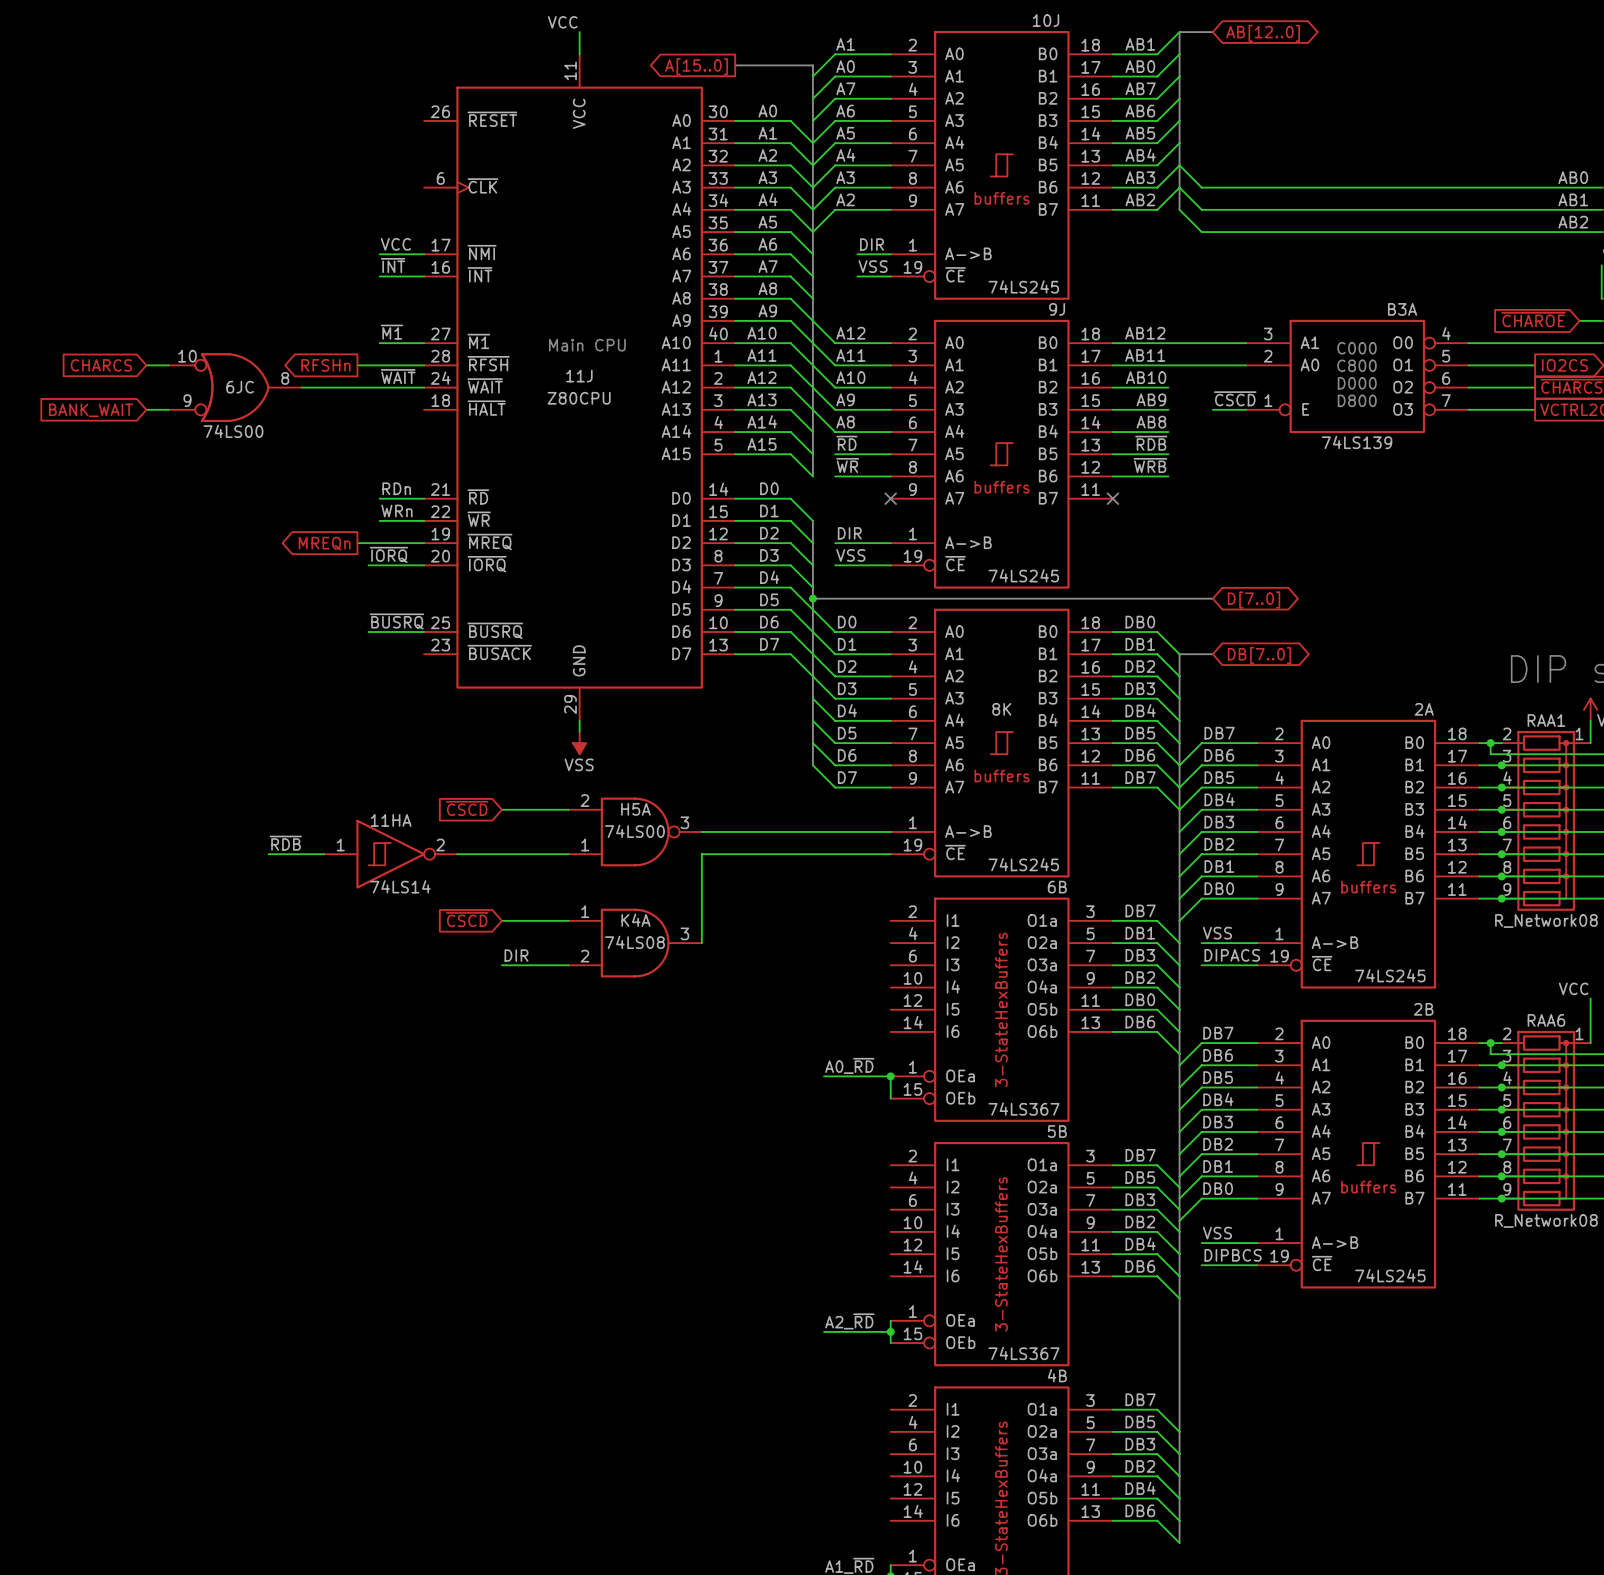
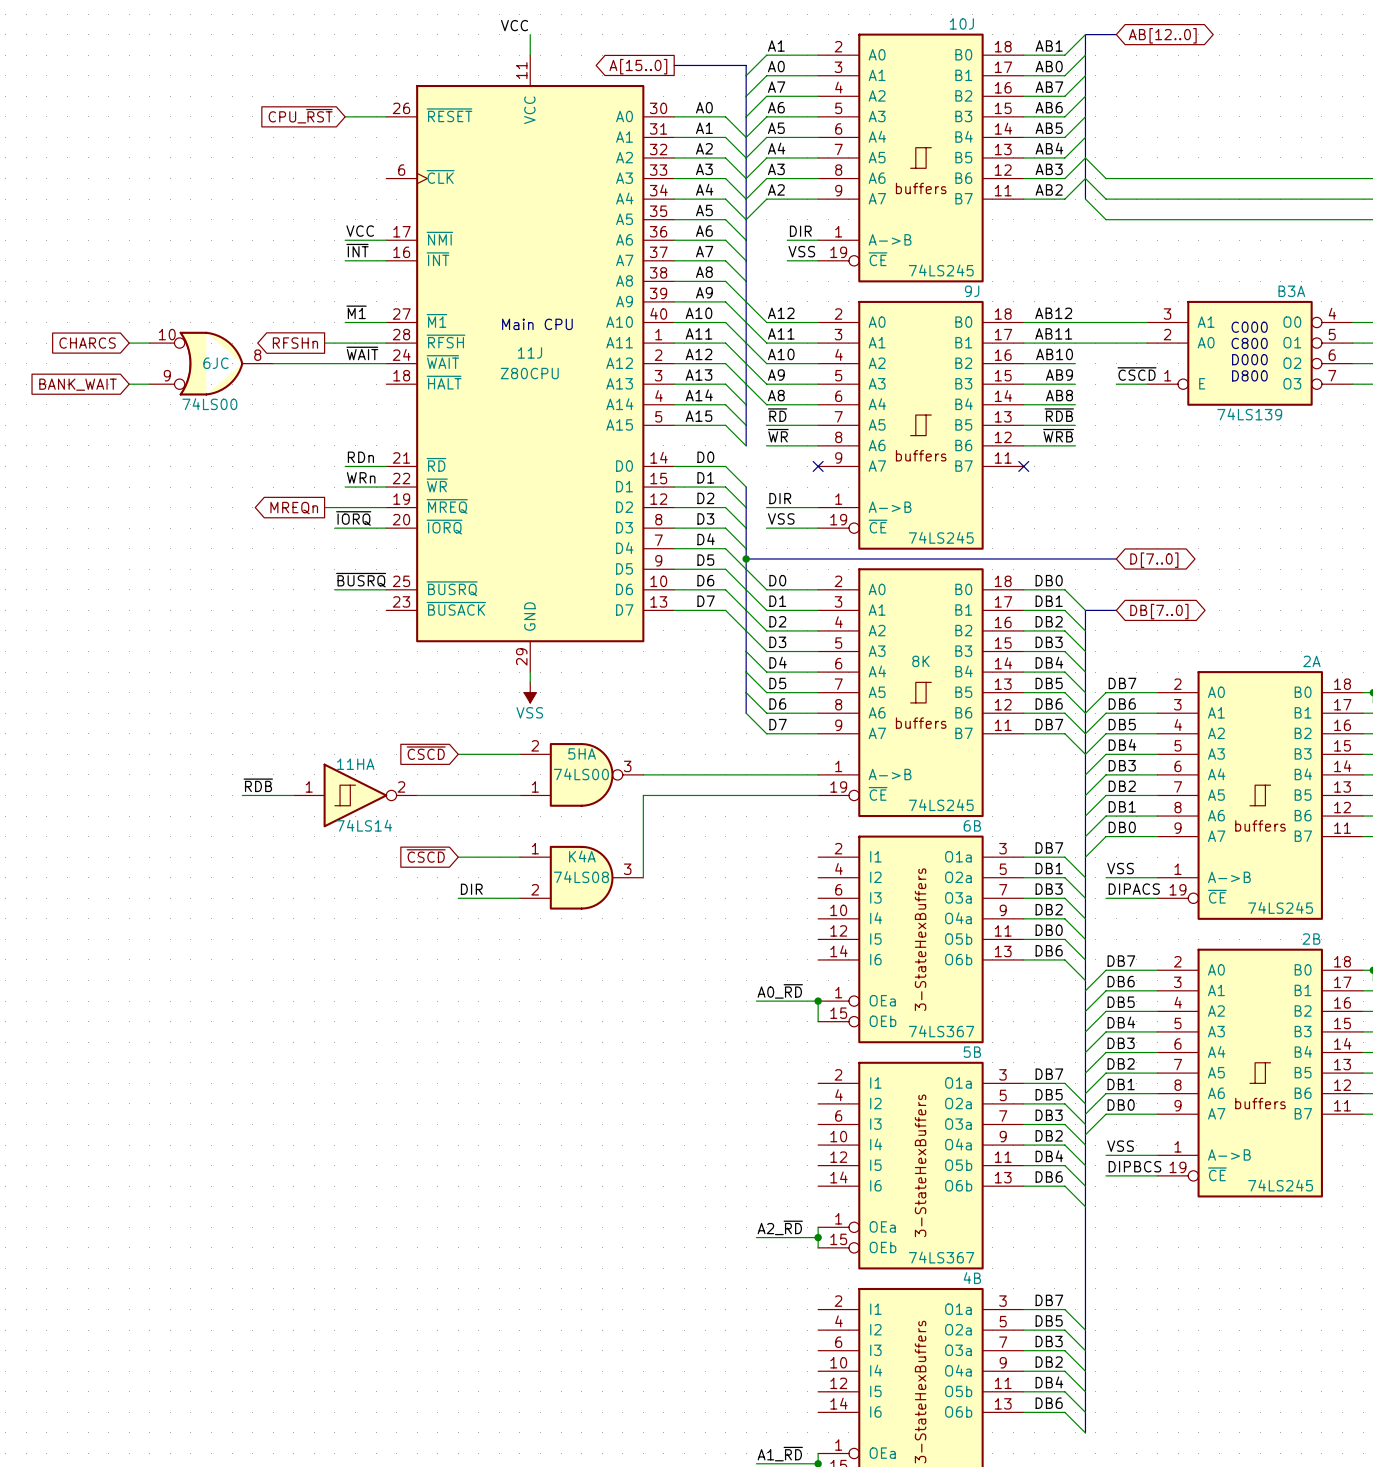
global label: none -> CPU_~{RST} (300, 116)
wire: none -> (345, 116) (386, 116)
H5A name: H5A (635, 809) -> 5HA (582, 753)

